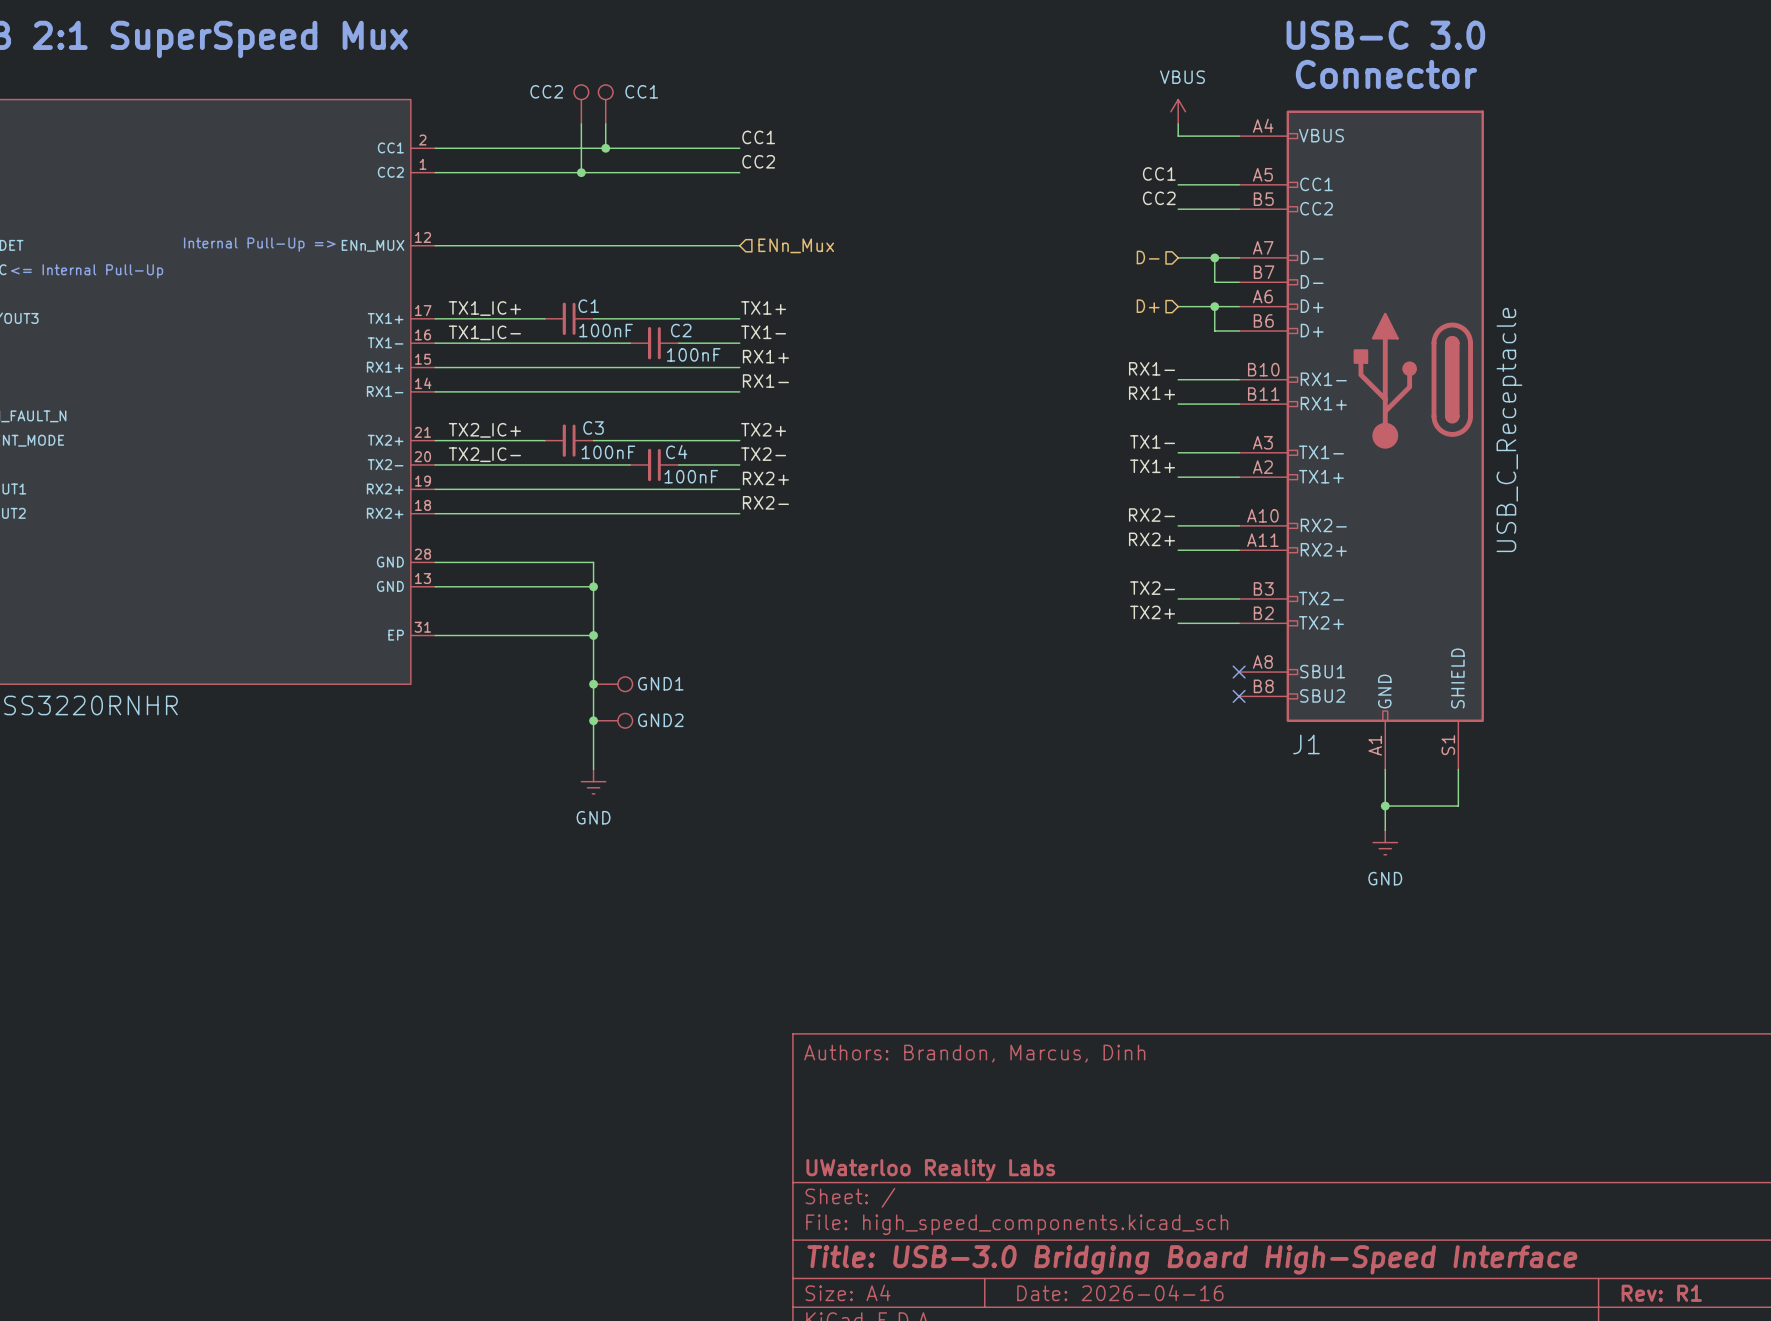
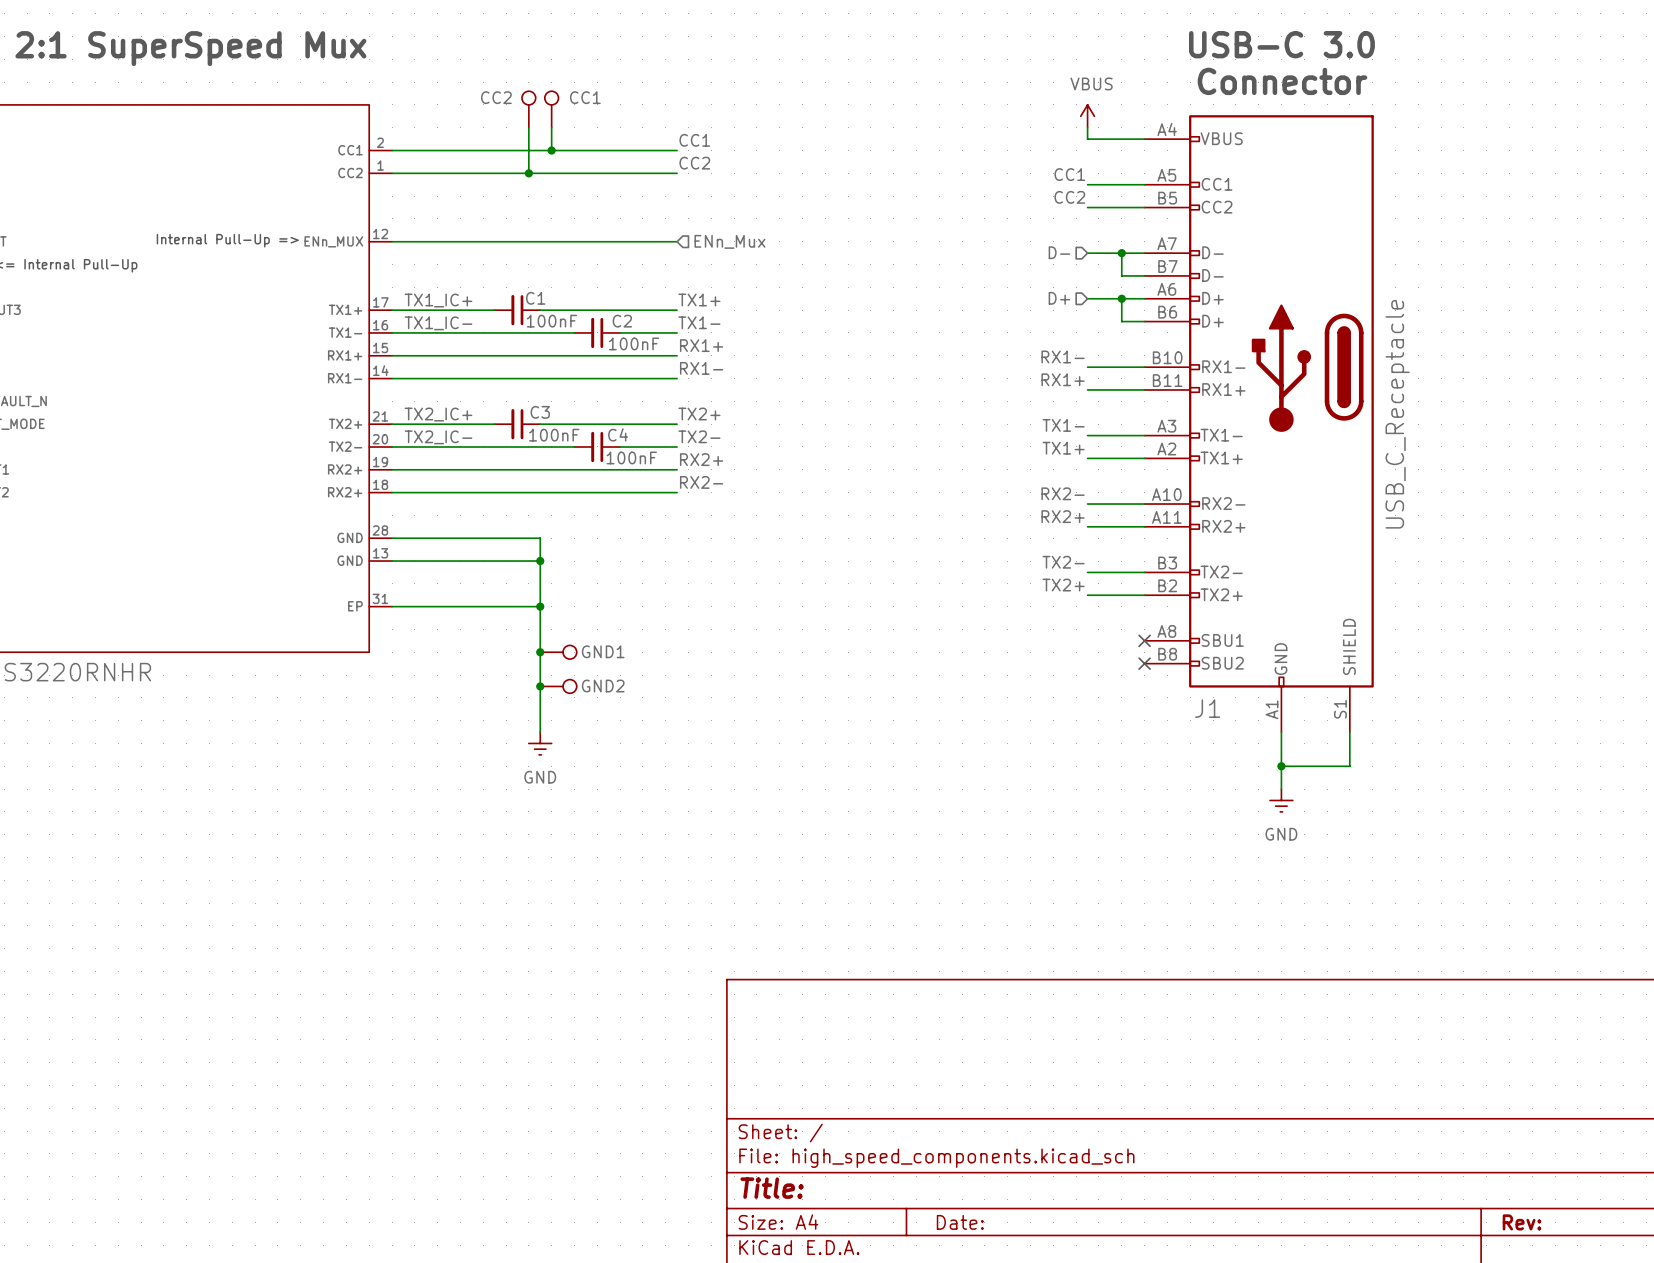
title block: Authors: Brandon, Marcus, Dinh (974, 1053) -> none
title block: UWaterloo Reality Labs (930, 1170) -> none
title block: Title: USB-3.0 Bridging Board High-Speed Interface (1192, 1259) -> Title: (772, 1188)
title block: Date: 2026-04-16 (1120, 1292) -> Date: (960, 1222)
title block: Rev: R1 (1661, 1293) -> Rev: (1521, 1222)

